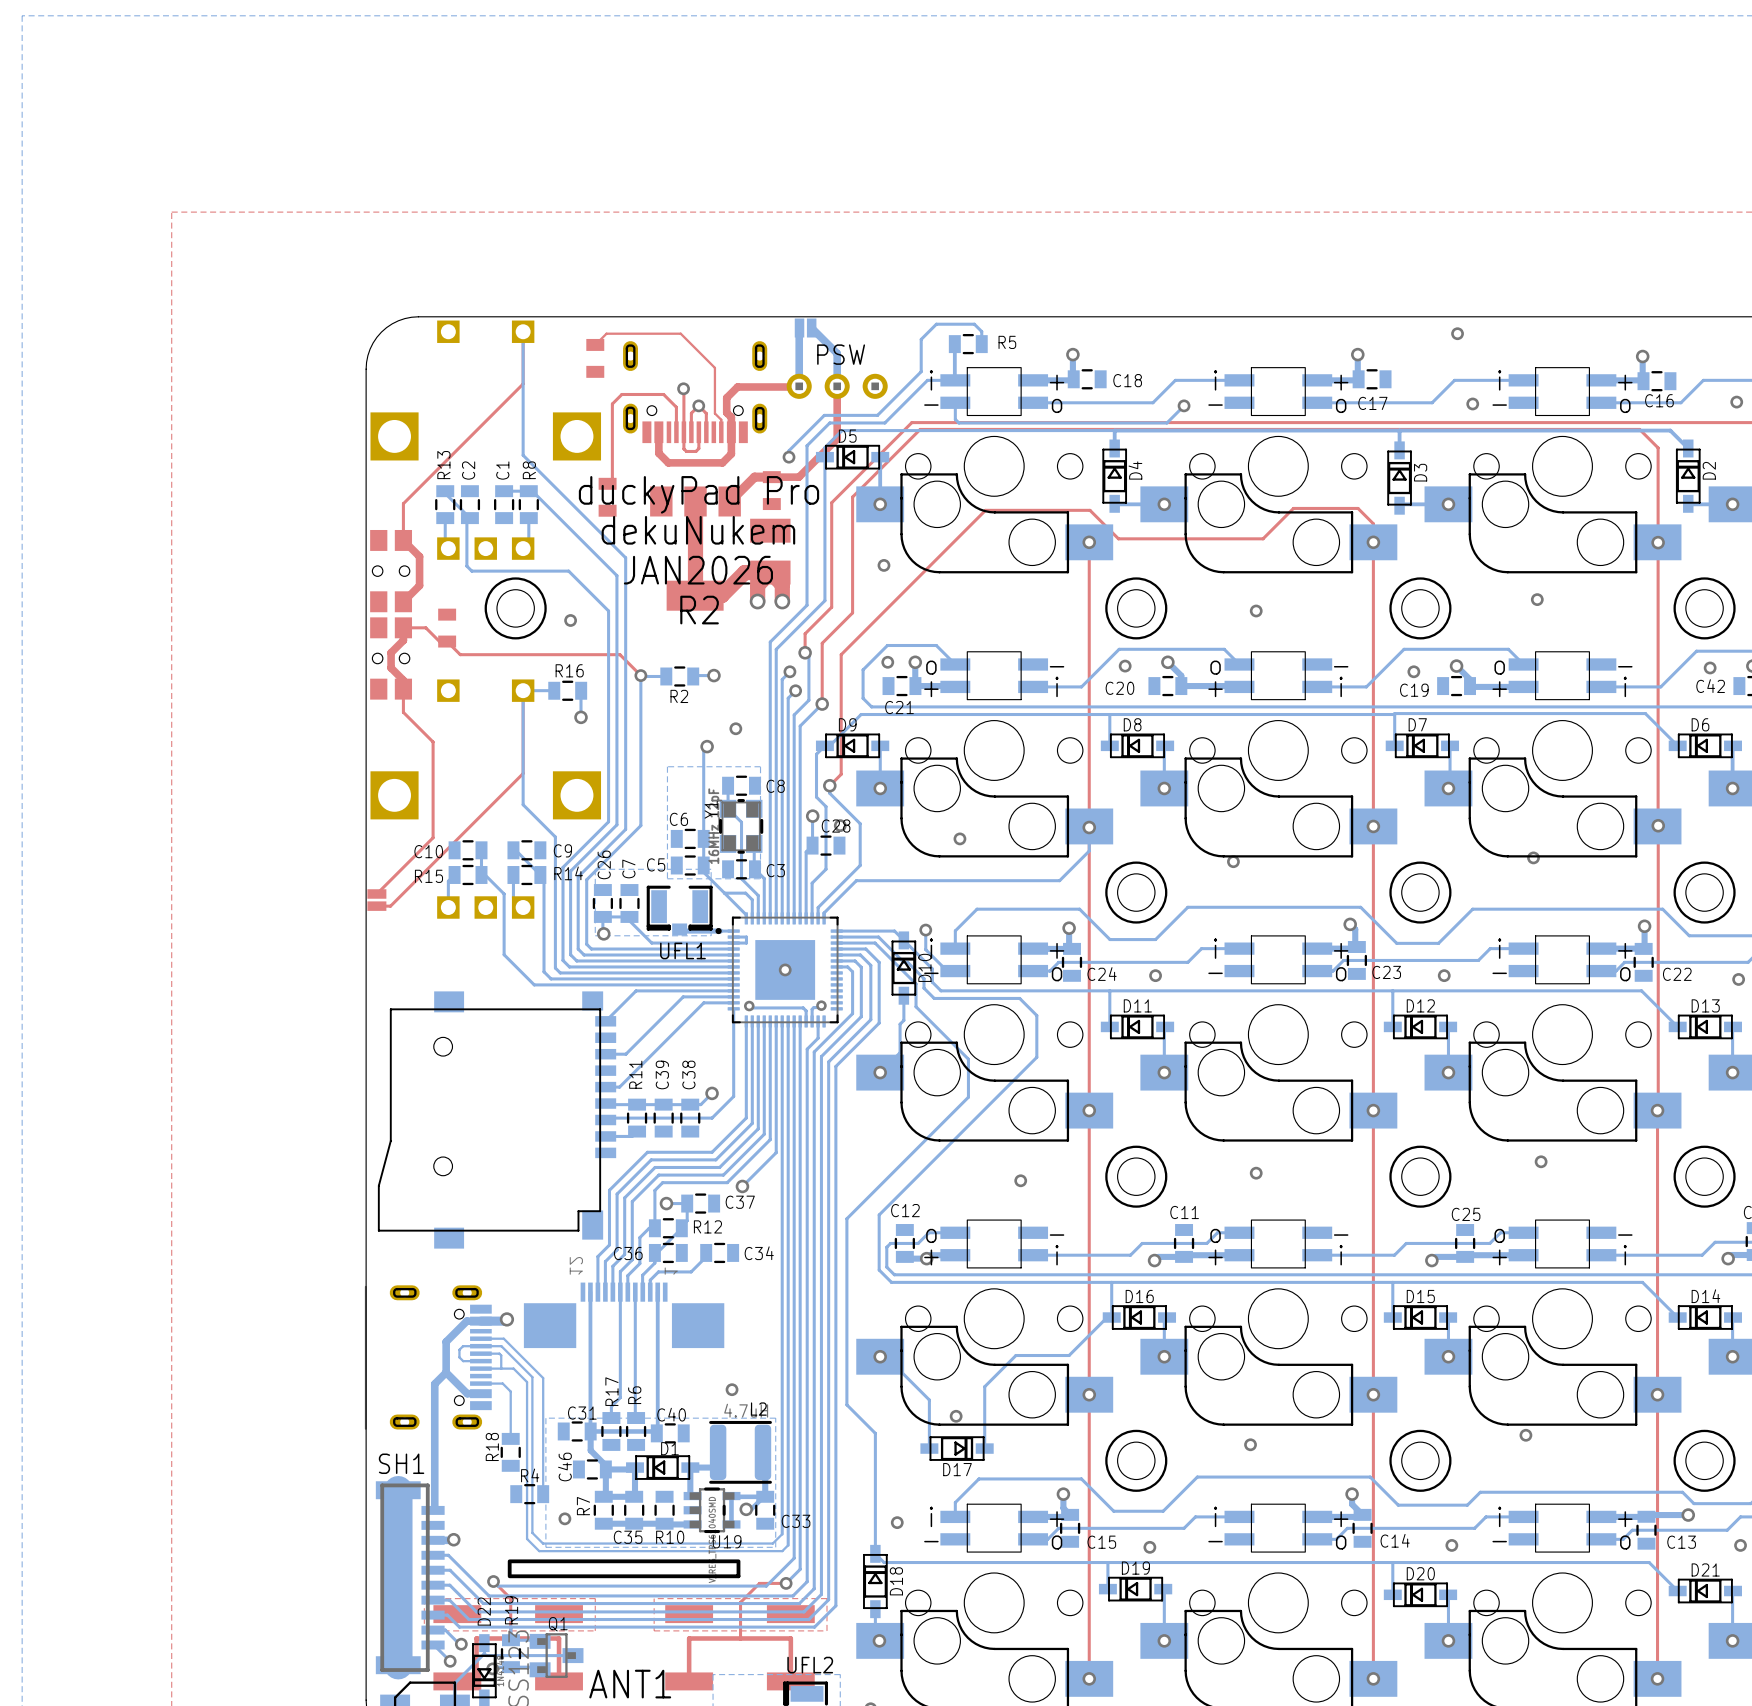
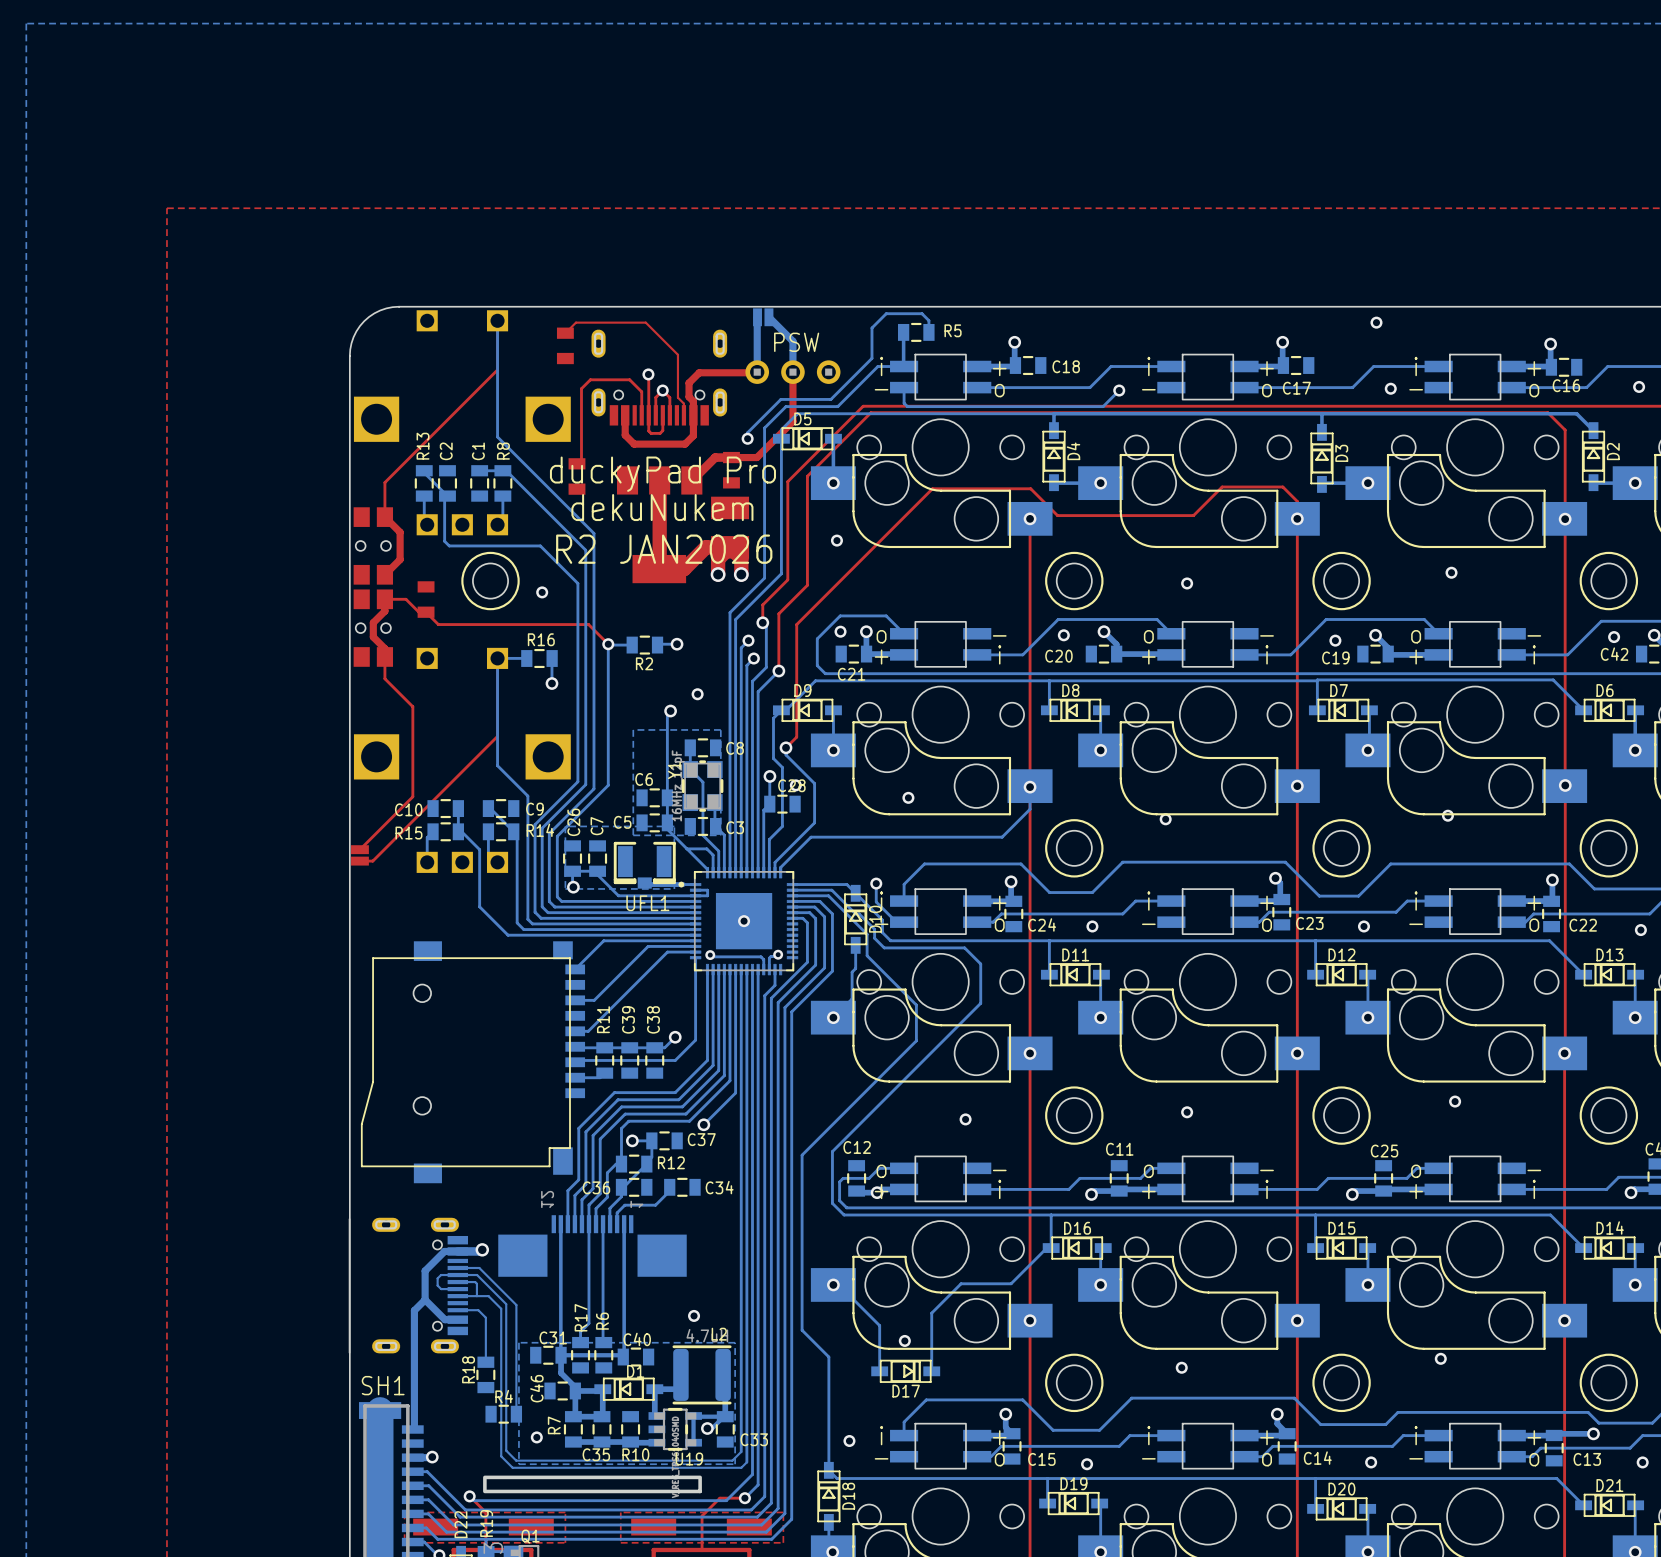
text: JAN2026 (698, 570) -> R2 JAN2026 (664, 549)
text: R2 (699, 610) -> none

